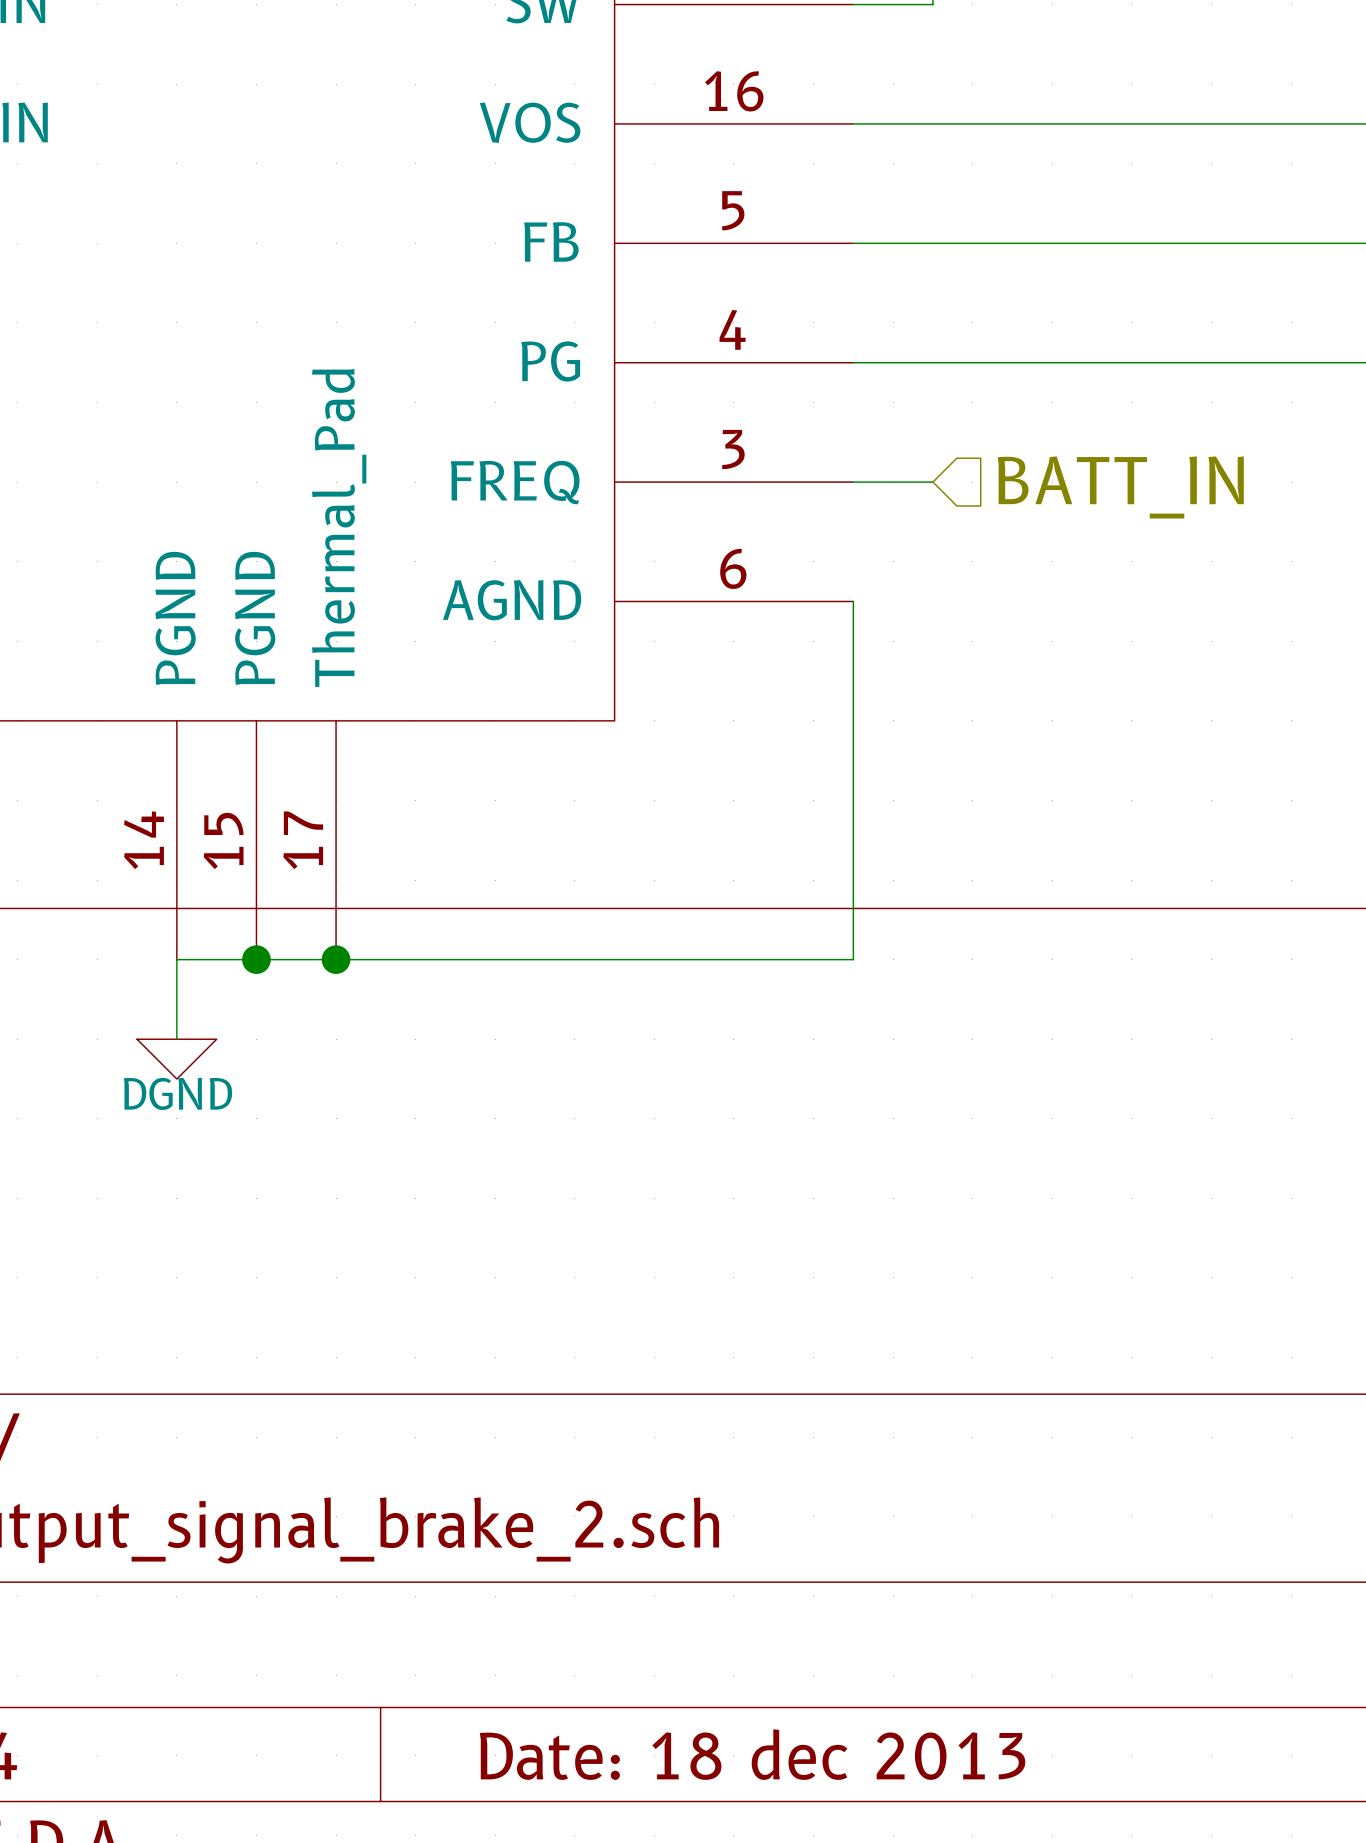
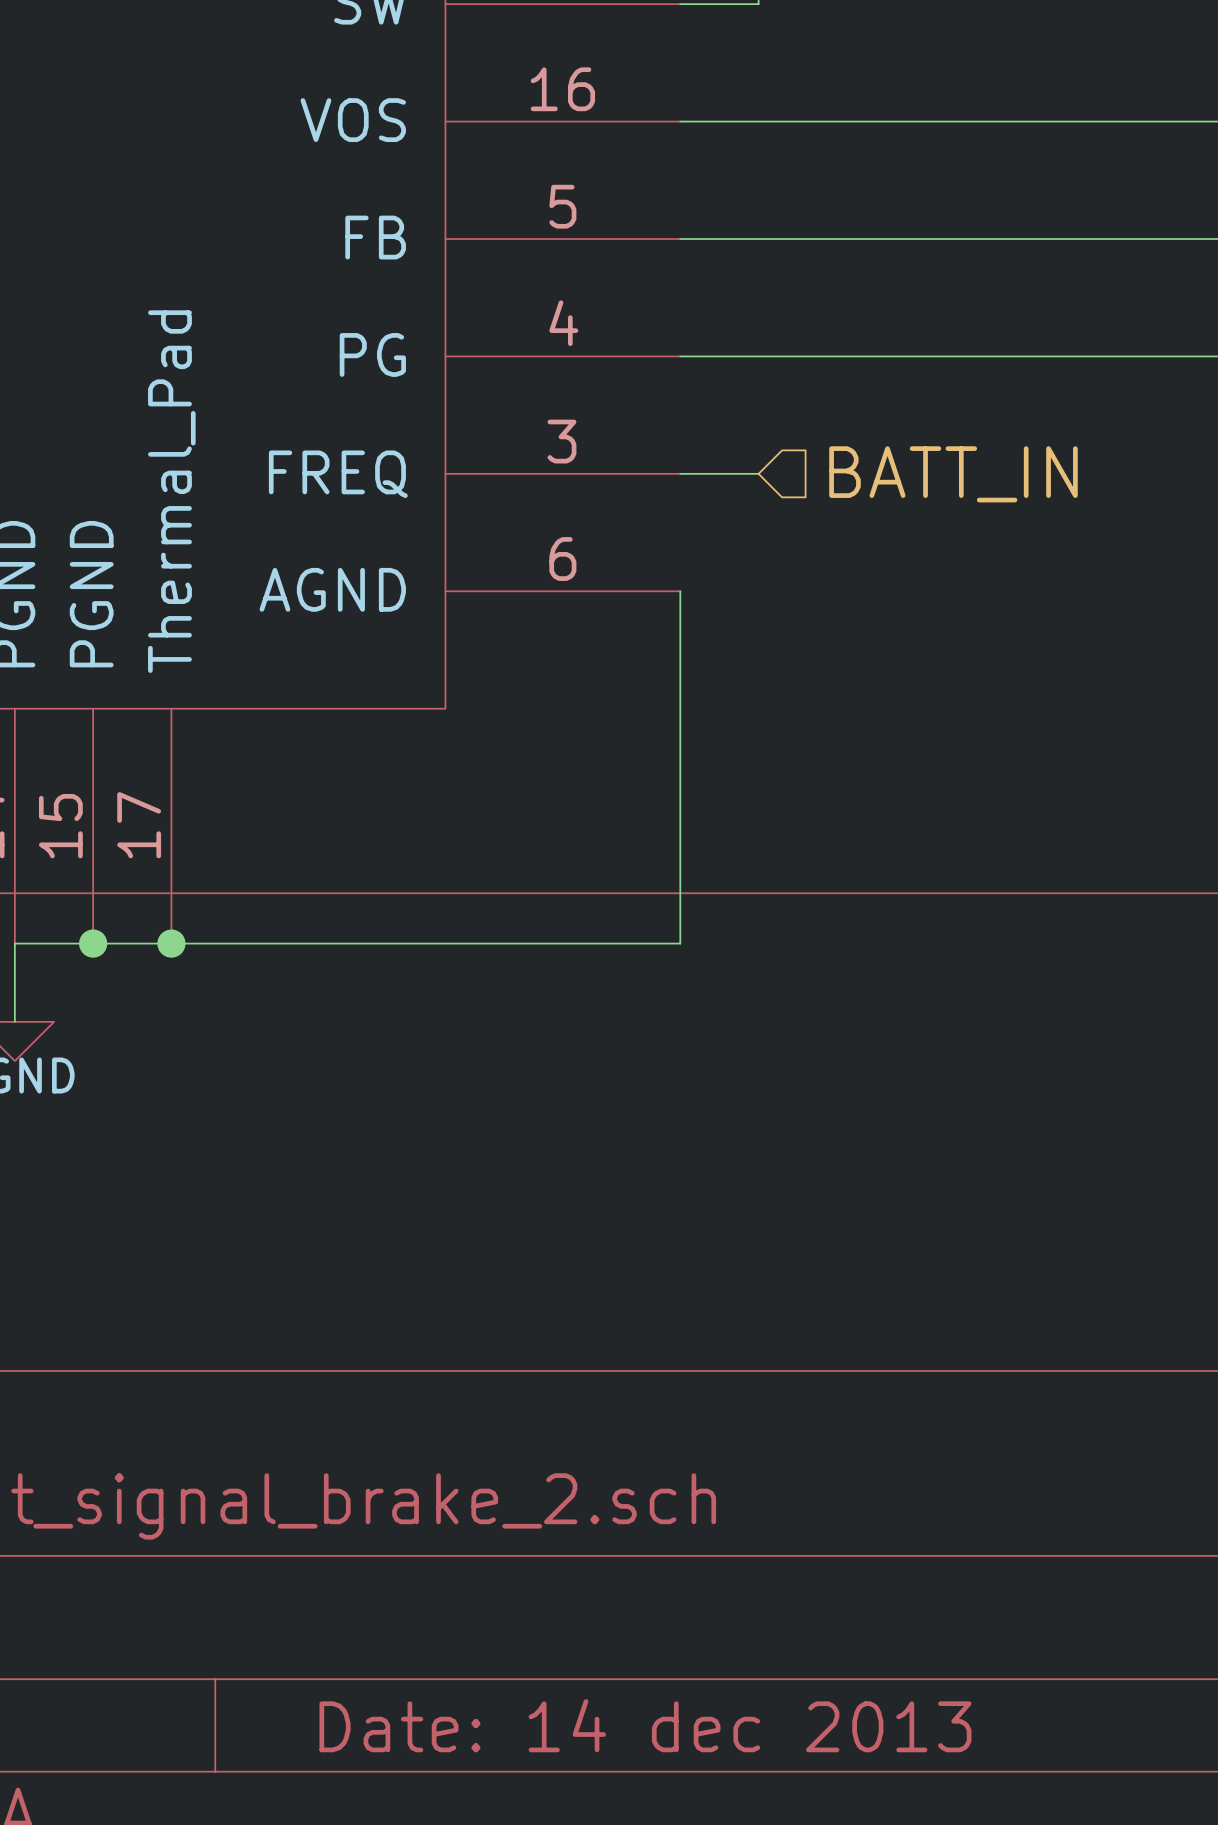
title block: Date: 18 dec 2013 (752, 1754) -> Date: 14 dec 2013 (645, 1725)

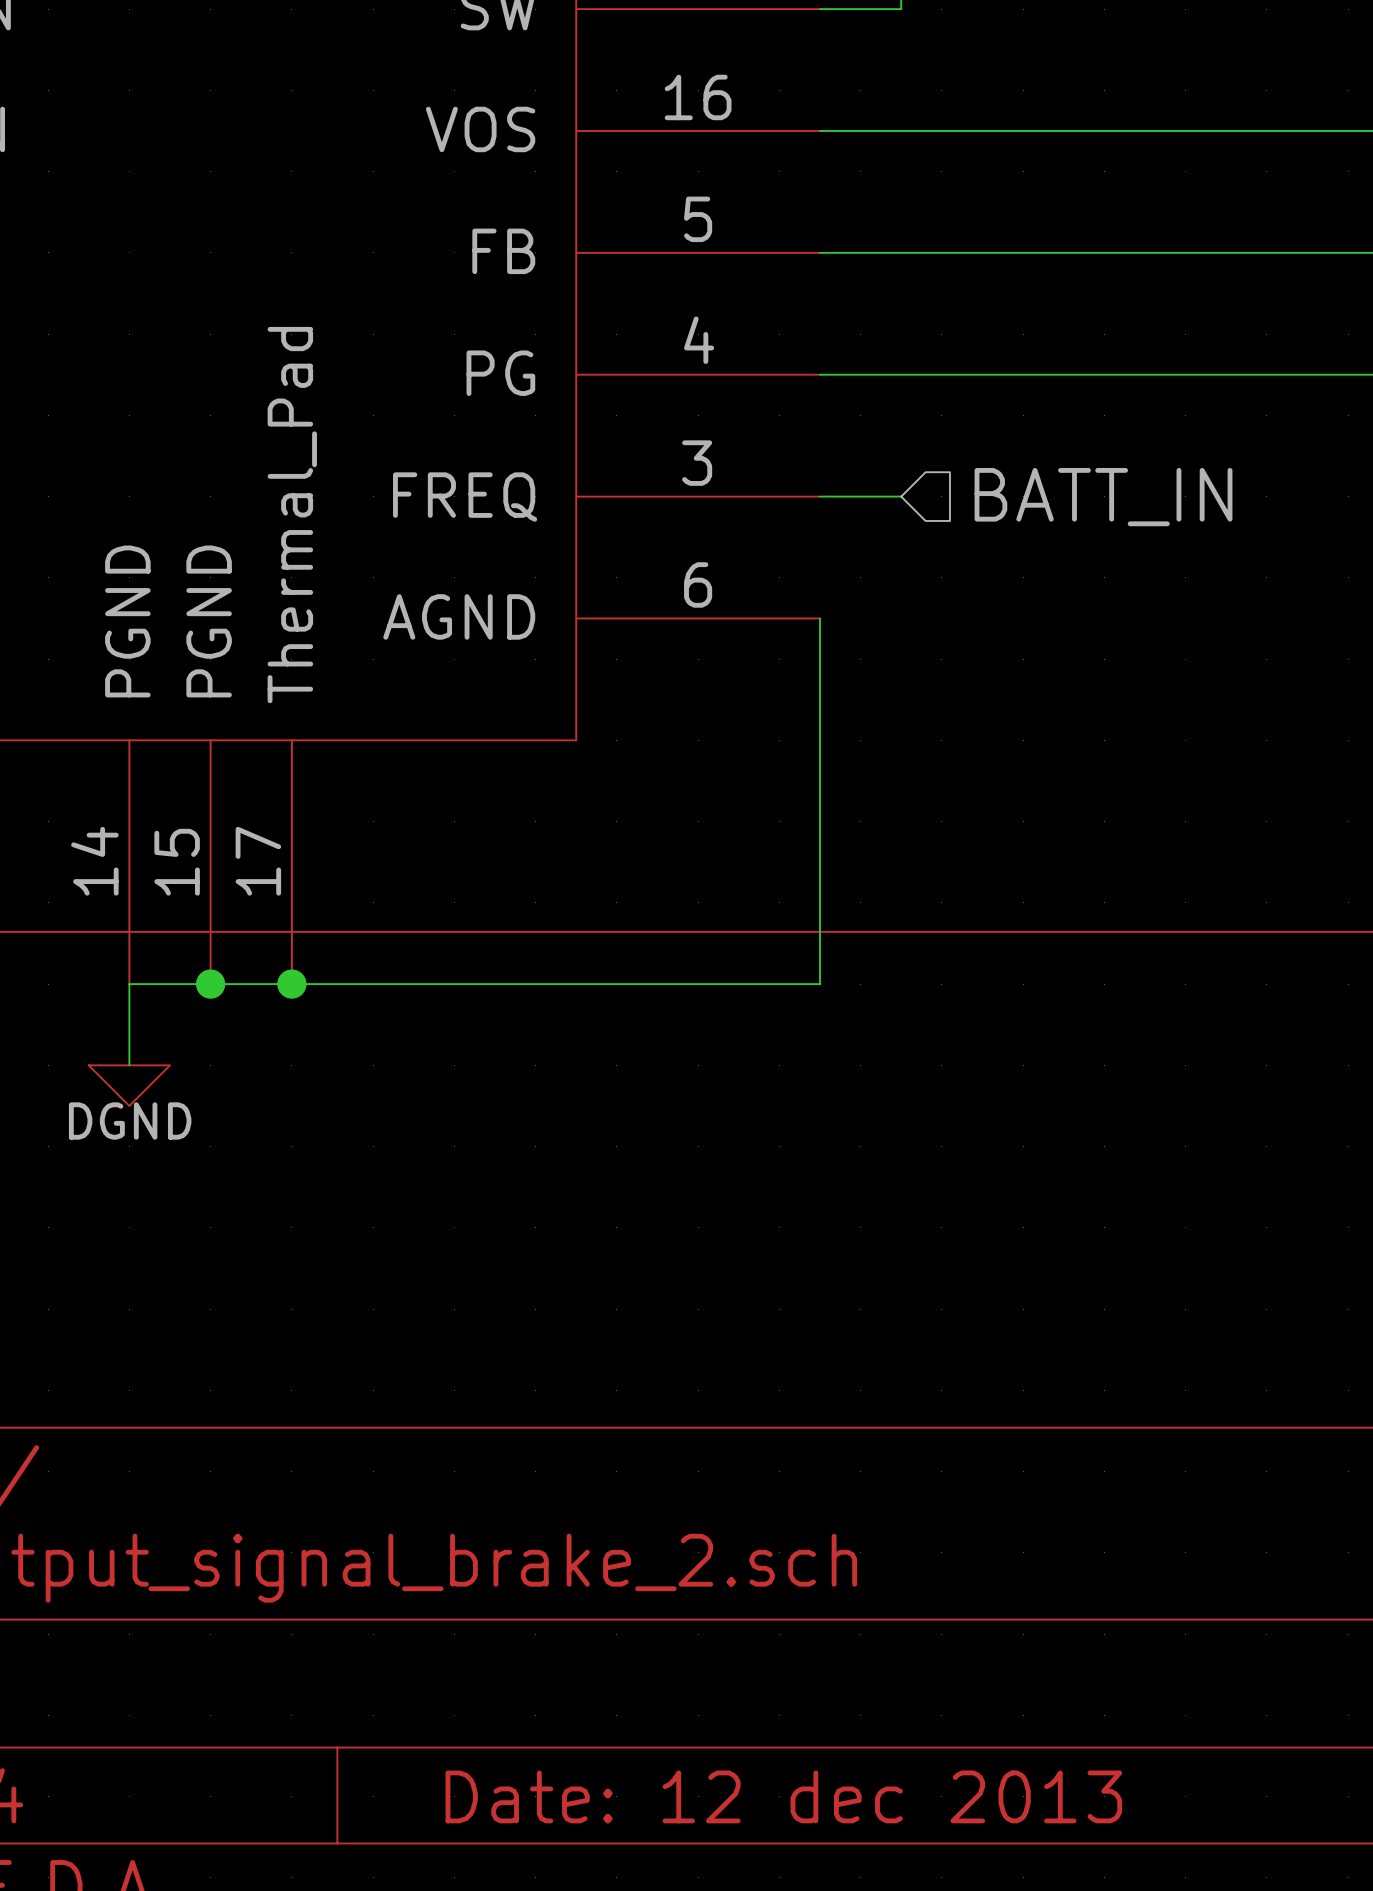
title block: Date: 14 dec 2013 (645, 1725) -> Date: 12 dec 2013 (783, 1796)

